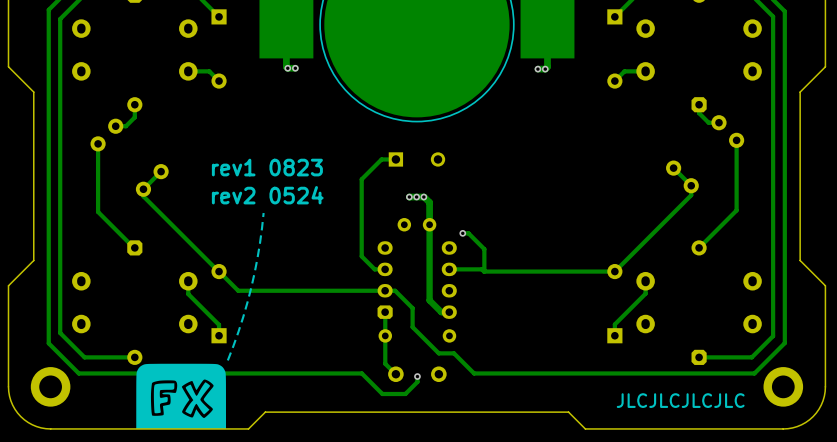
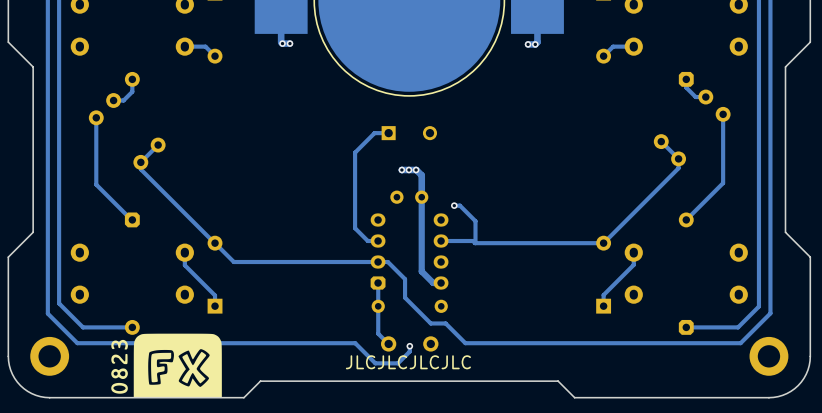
text: rev1 0823 (267, 167) -> none
text: rev2 0524 (267, 195) -> none
line: (263, 213) (251, 288) (227, 360) -> none
drawing: none -> [111, 339, 128, 394]
text: none -> JLCJLCJLCJLC (408, 362)
text: JLCJLCJLCJLC (680, 400) -> none

